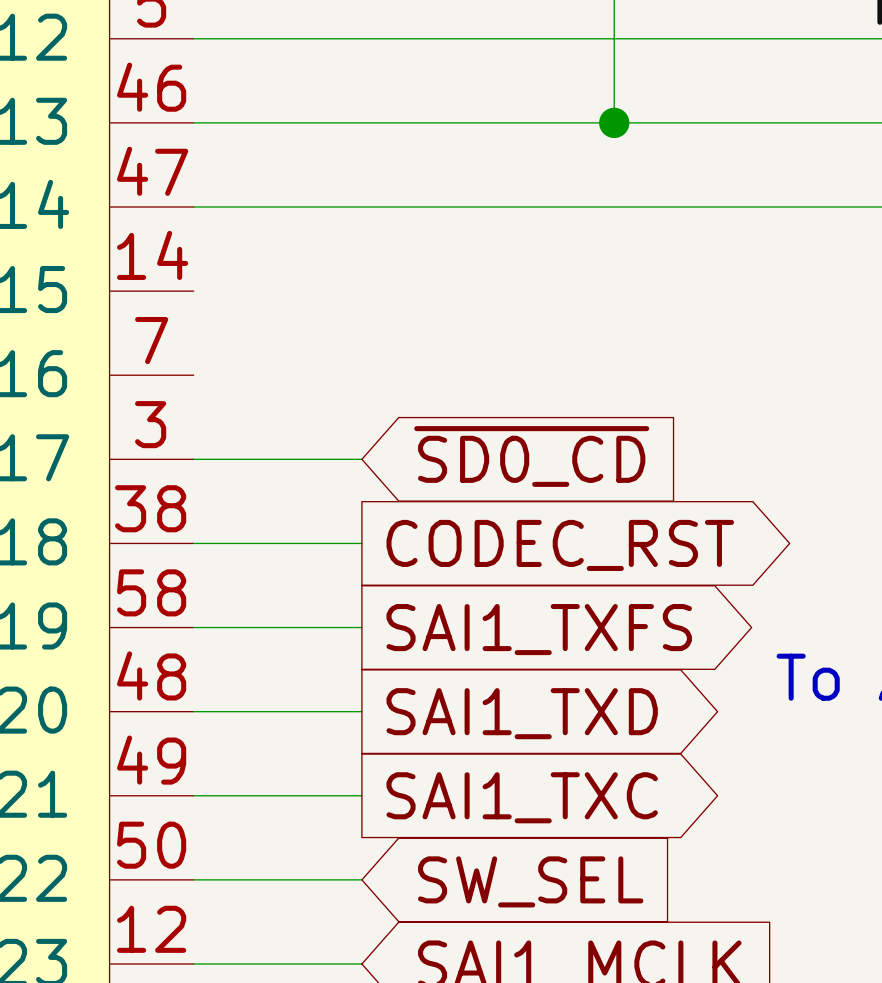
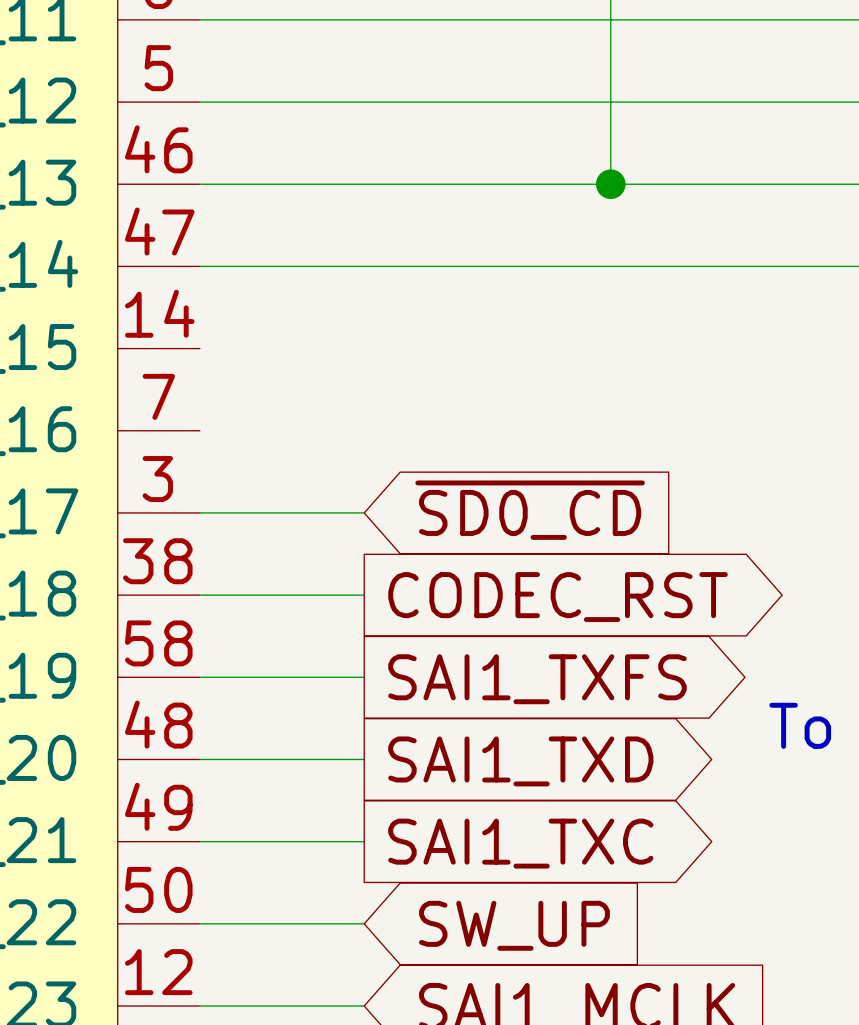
global label: SW_SEL (530, 881) -> SW_UP (514, 925)

